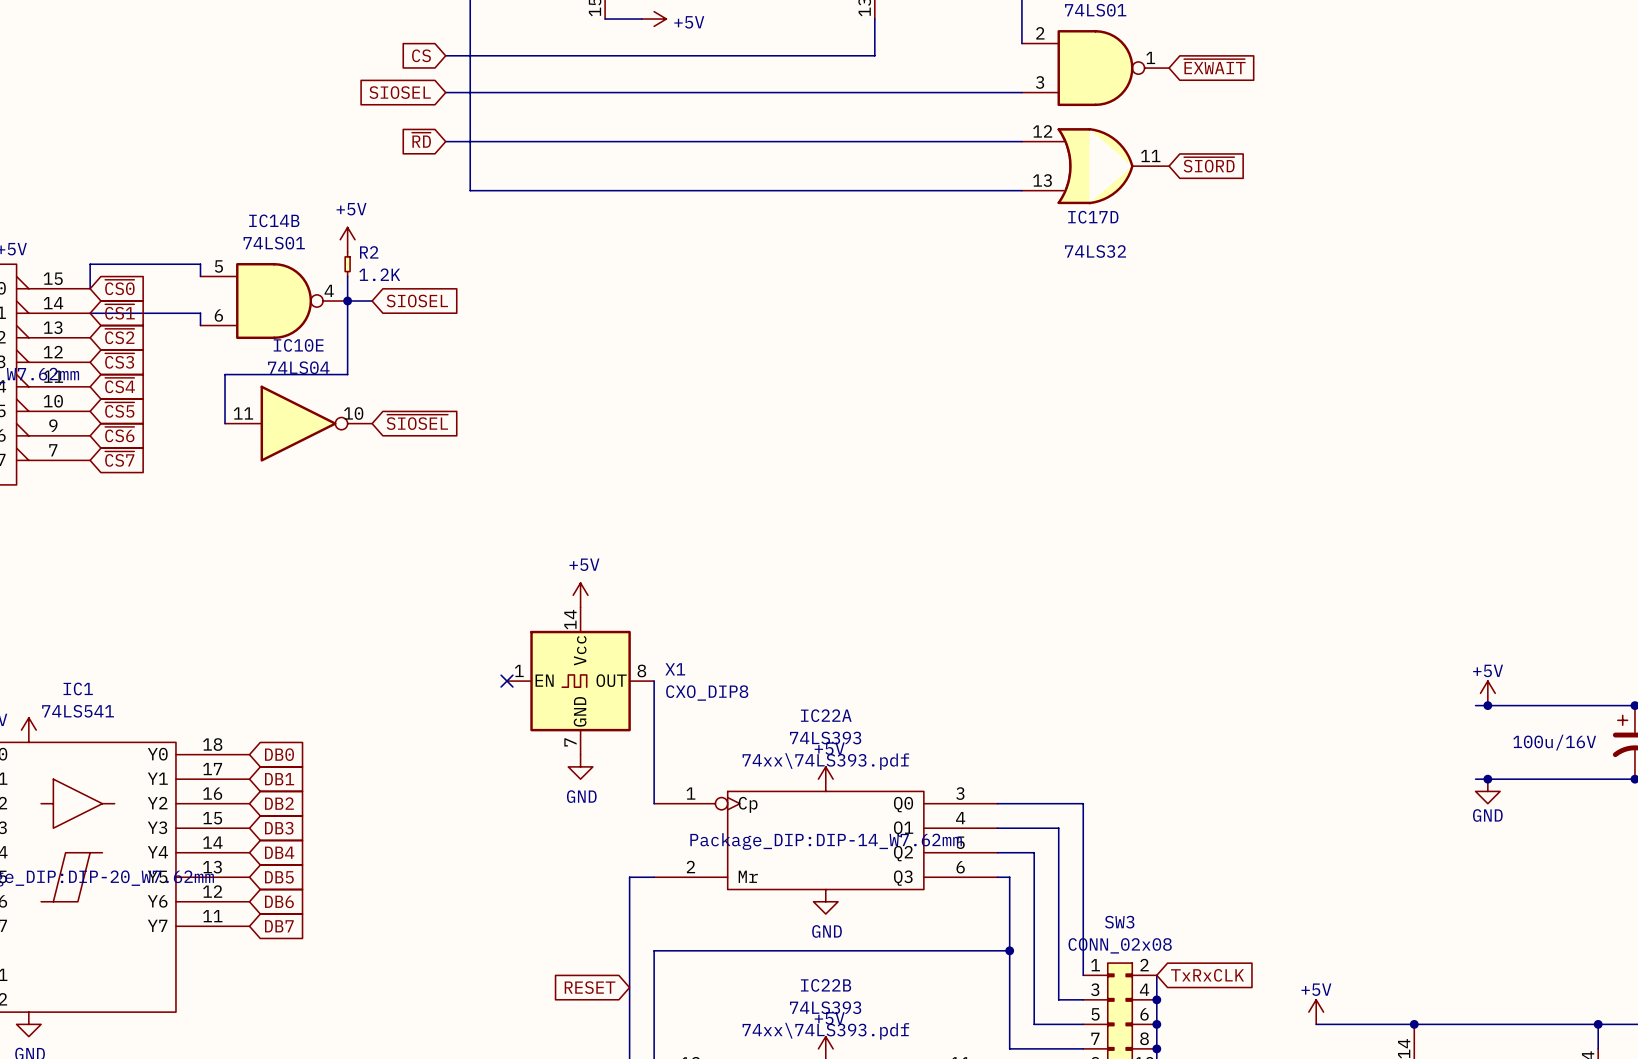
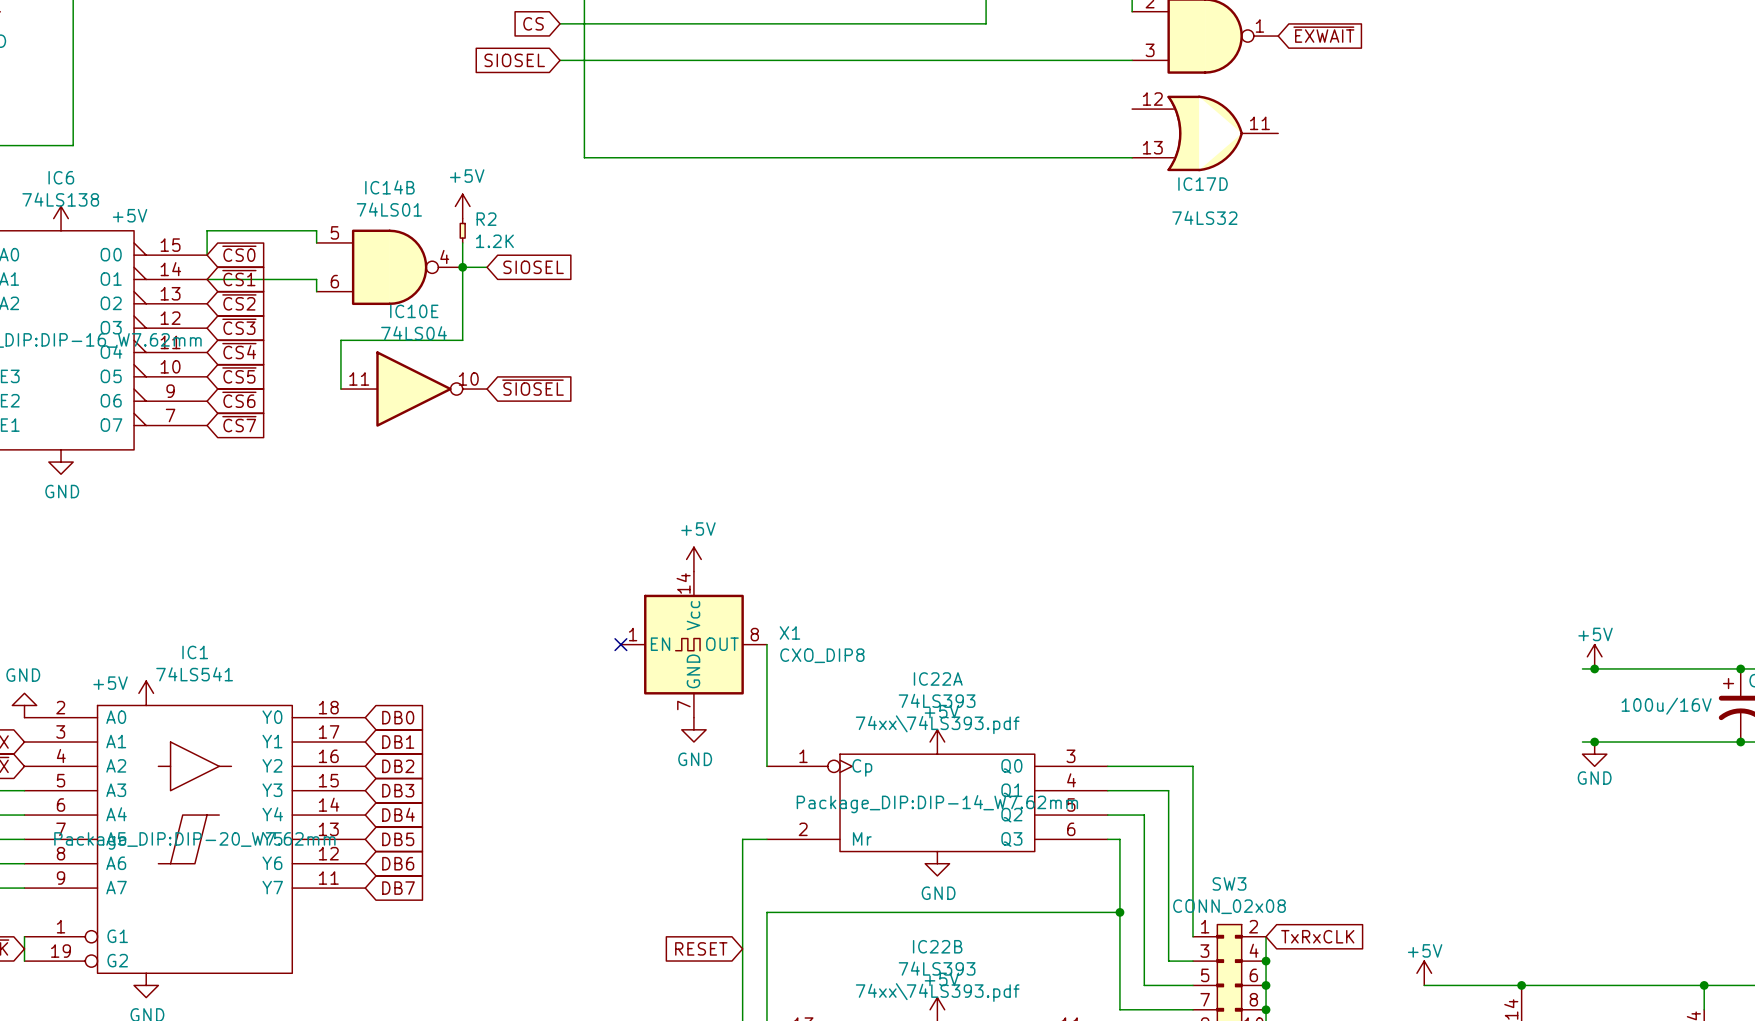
global label: ~{RD} (421, 140) -> none
wire: (445, 141) (1021, 141) -> none
global label: ~{SIORD} (1209, 164) -> none

